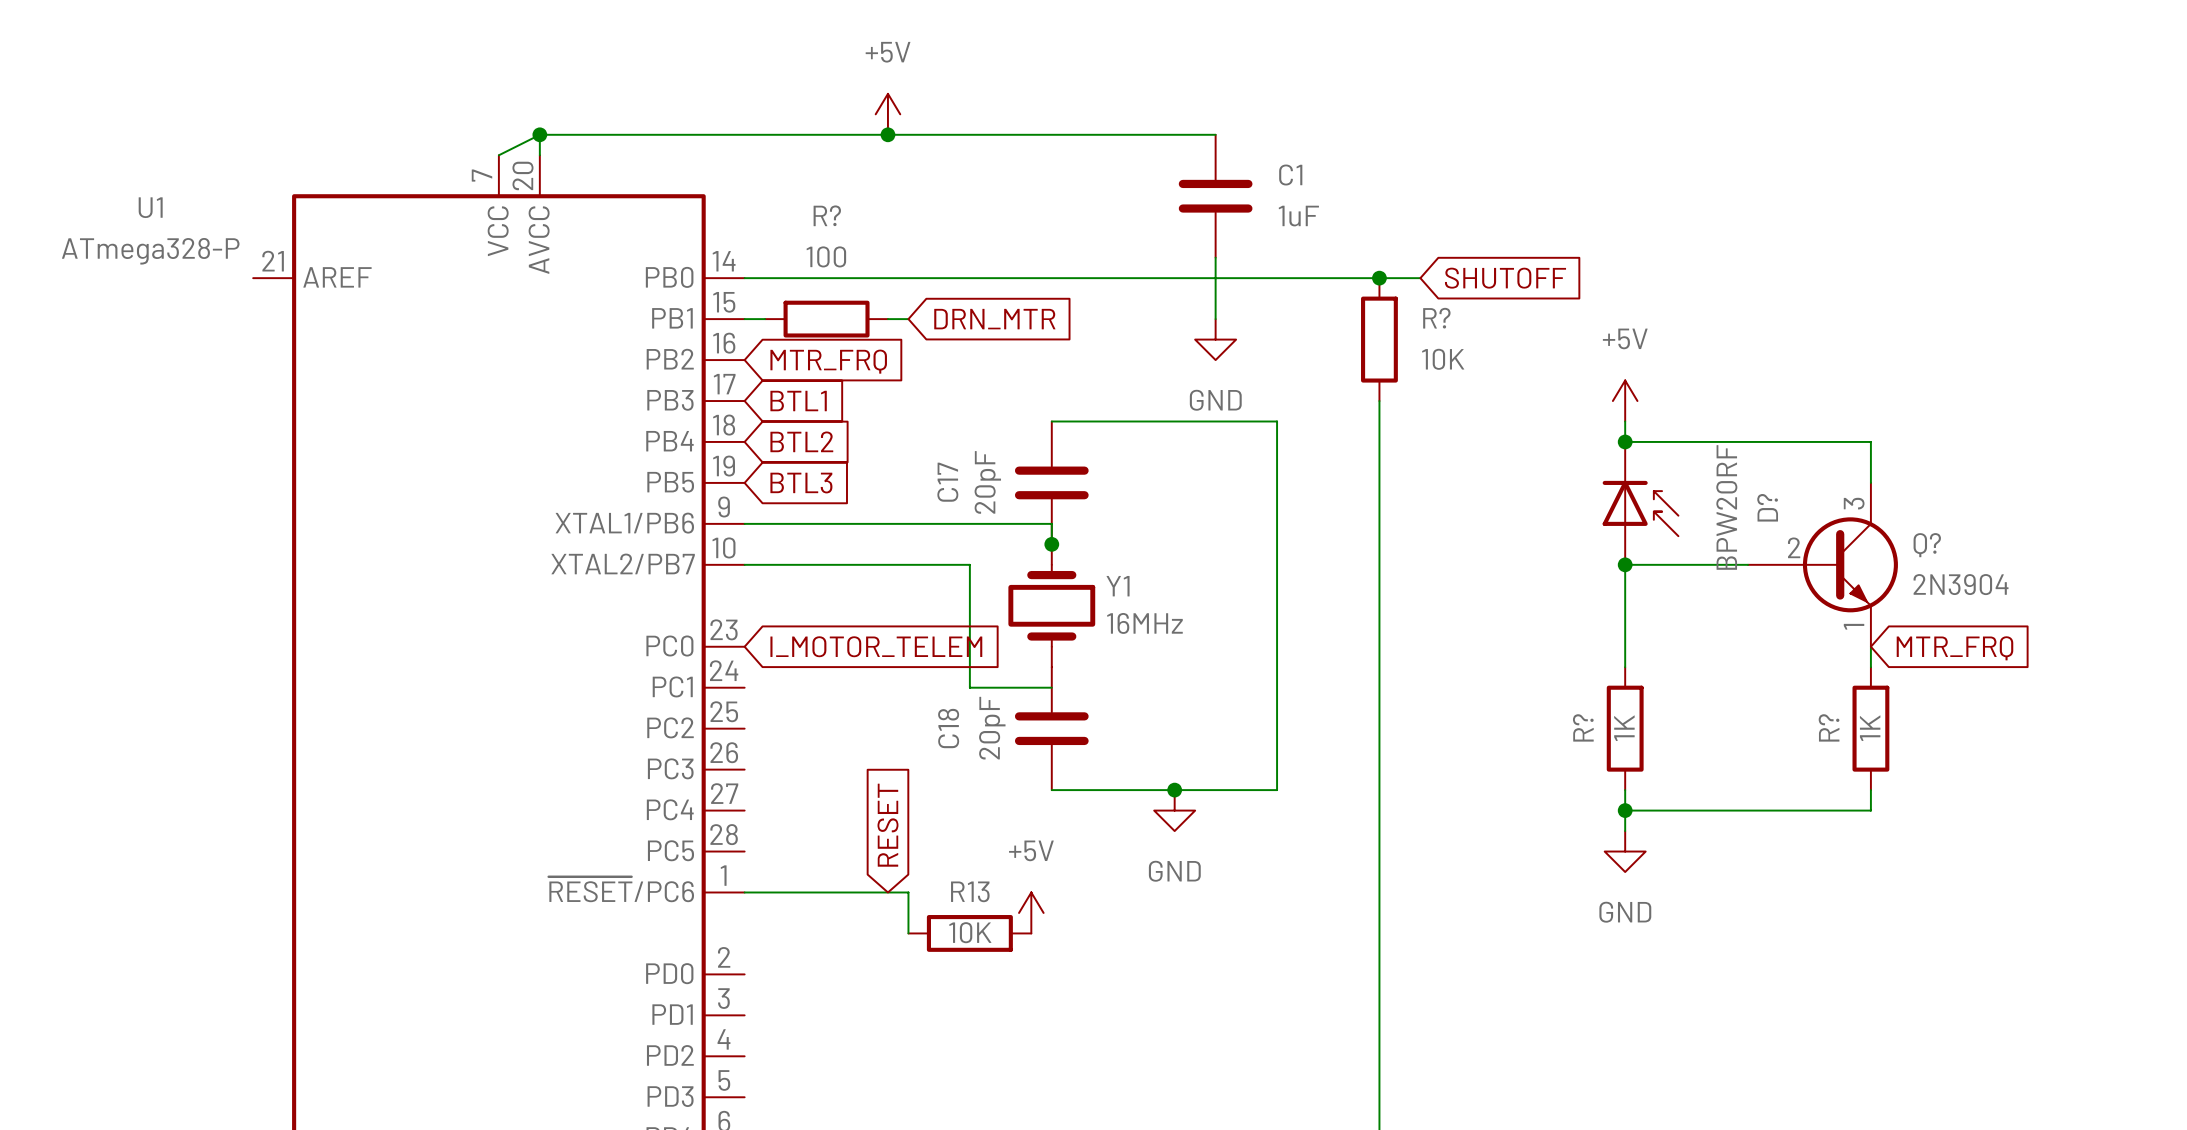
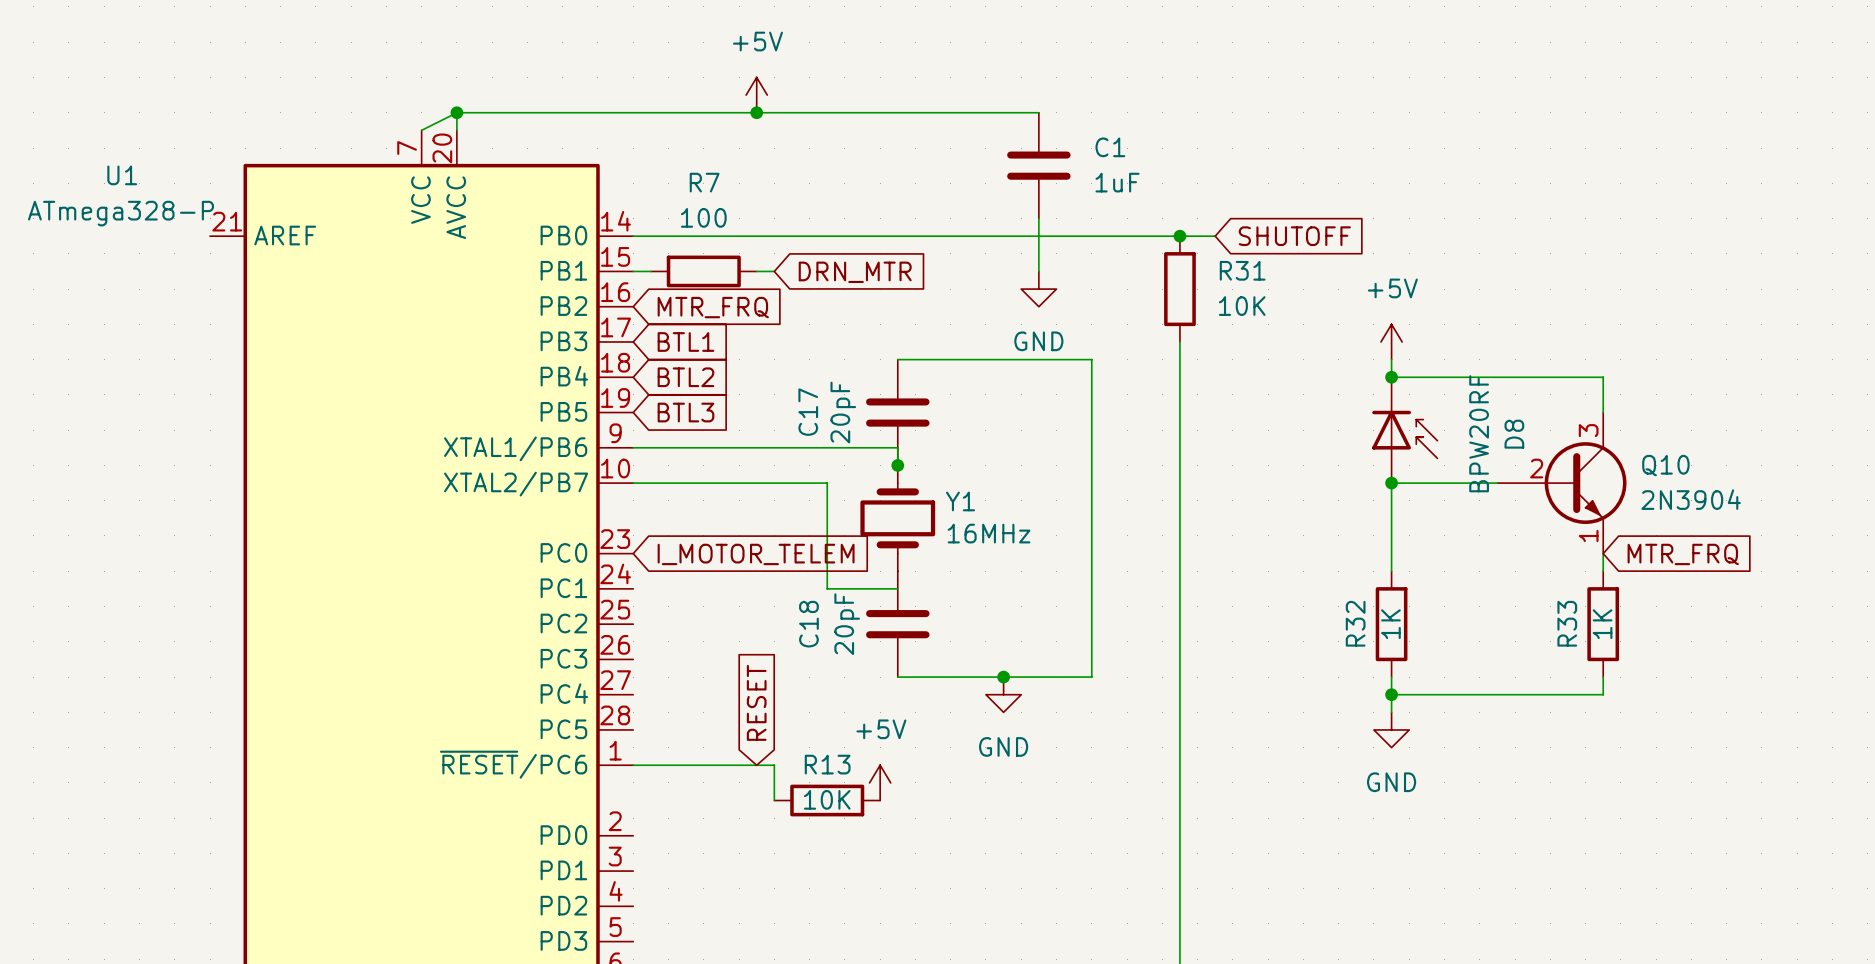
R? name: R? (827, 215) -> R7 (704, 182)
R? name: R? (1436, 318) -> R31 (1242, 270)
D? name: D? (1767, 507) -> D8 (1514, 434)
Q? name: Q? (1927, 545) -> Q10 (1665, 465)
R? name: R? (1583, 727) -> R32 (1355, 623)
R? name: R? (1829, 727) -> R33 (1567, 623)

